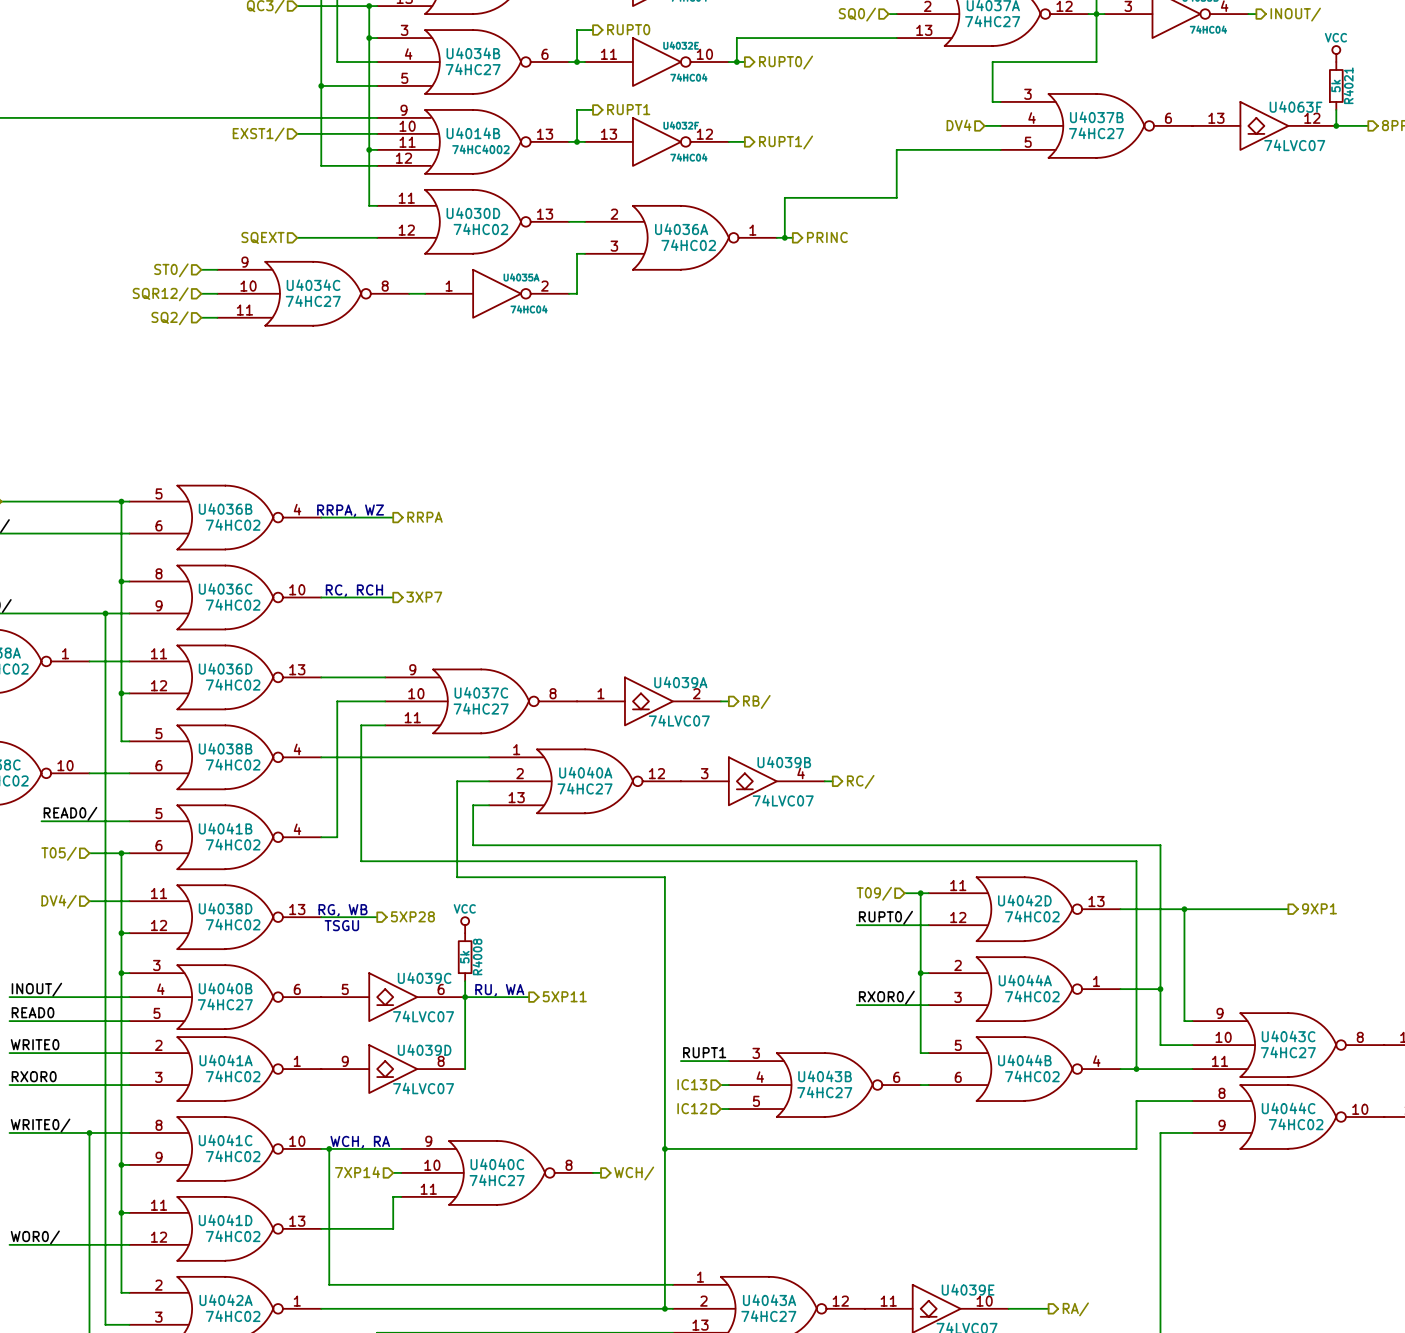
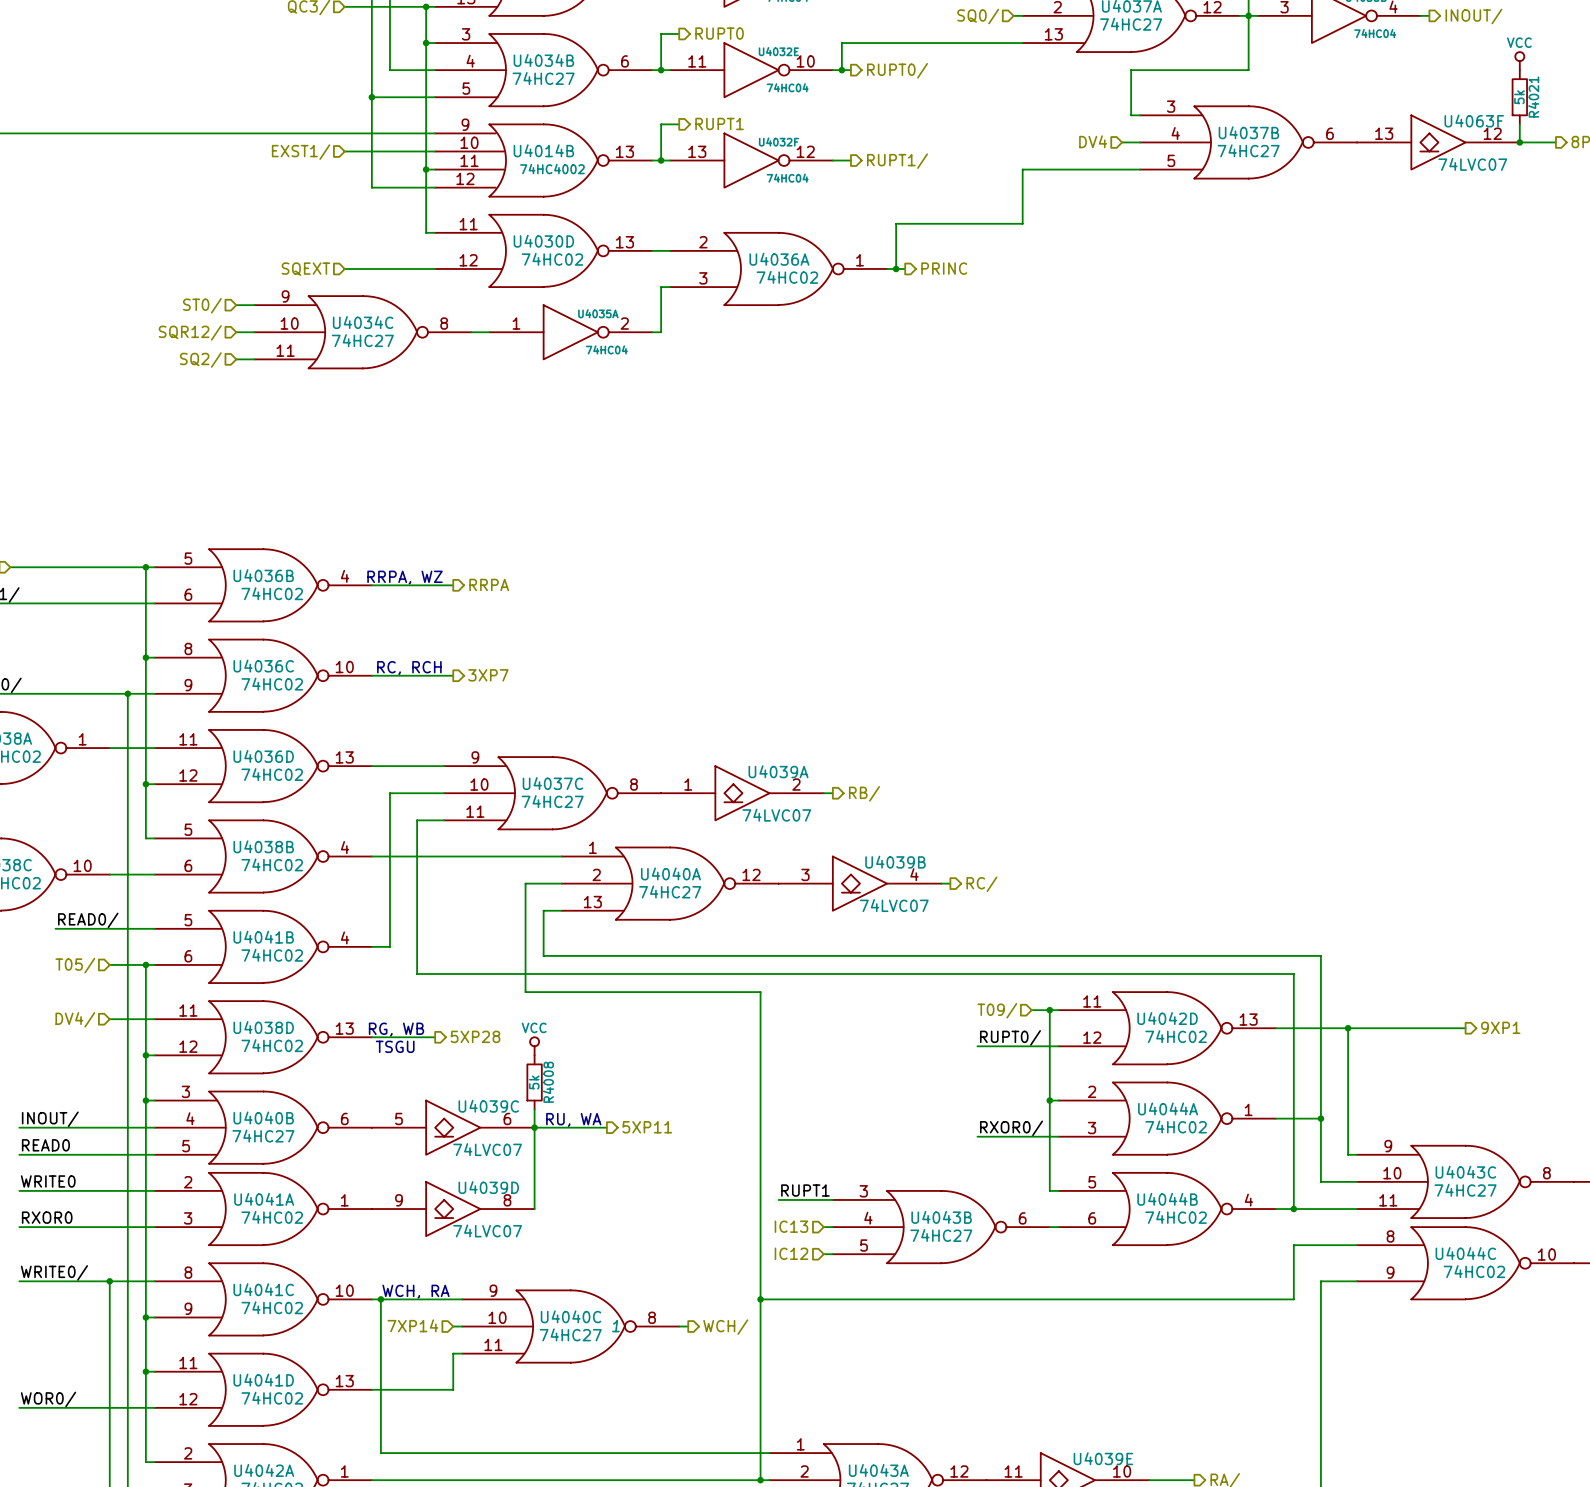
U4040C text: none -> 1 (615, 1326)

